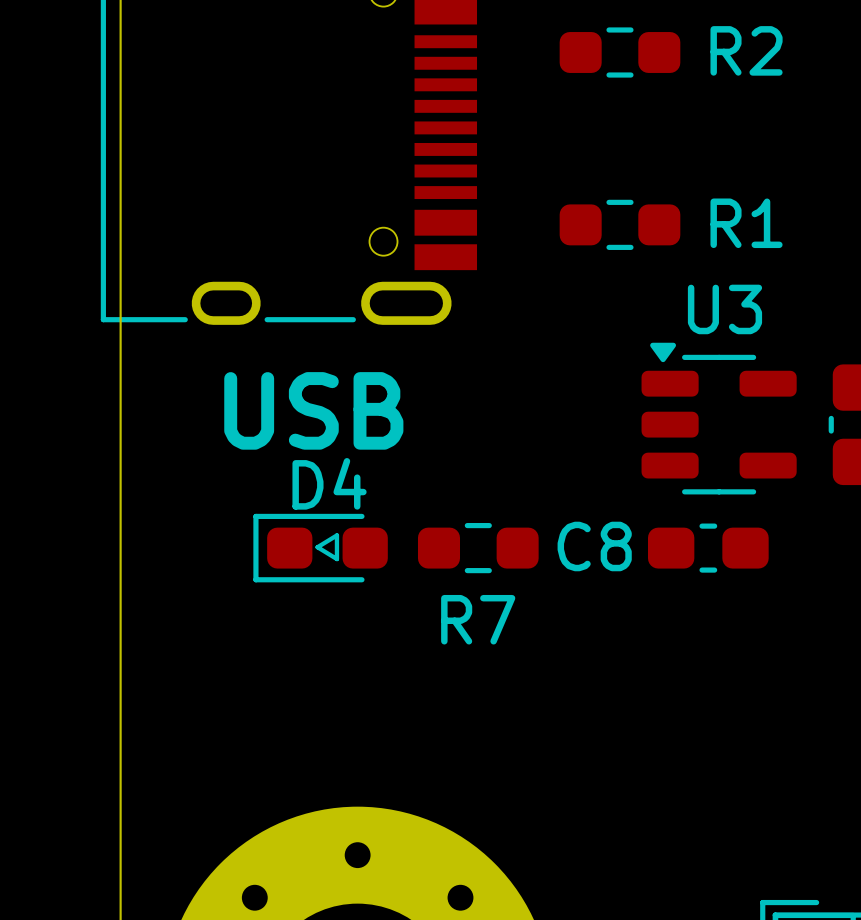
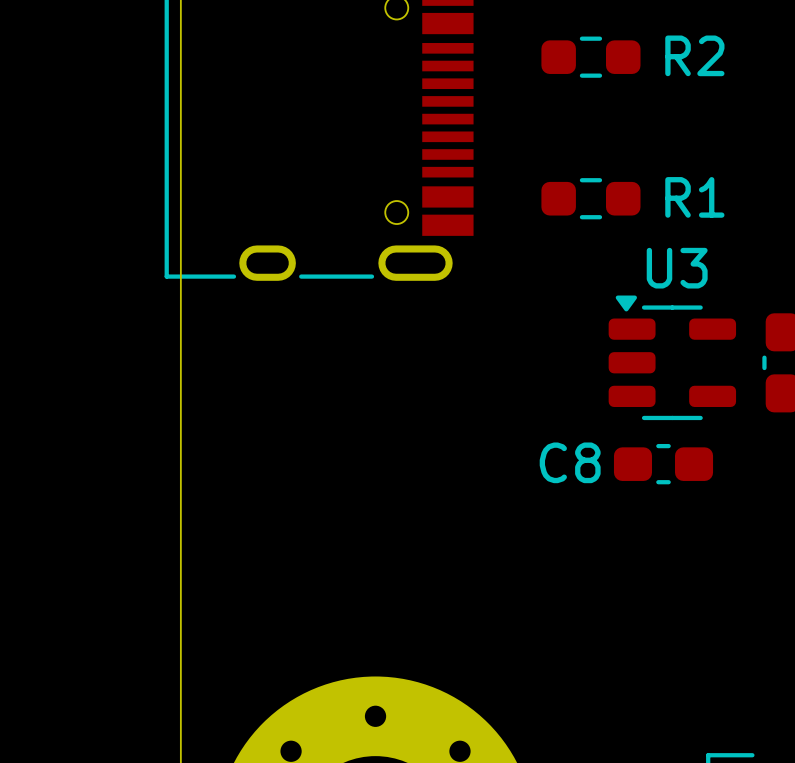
text: USB (313, 410) -> none
D4: (320, 548) -> none
R7: (478, 548) -> none

